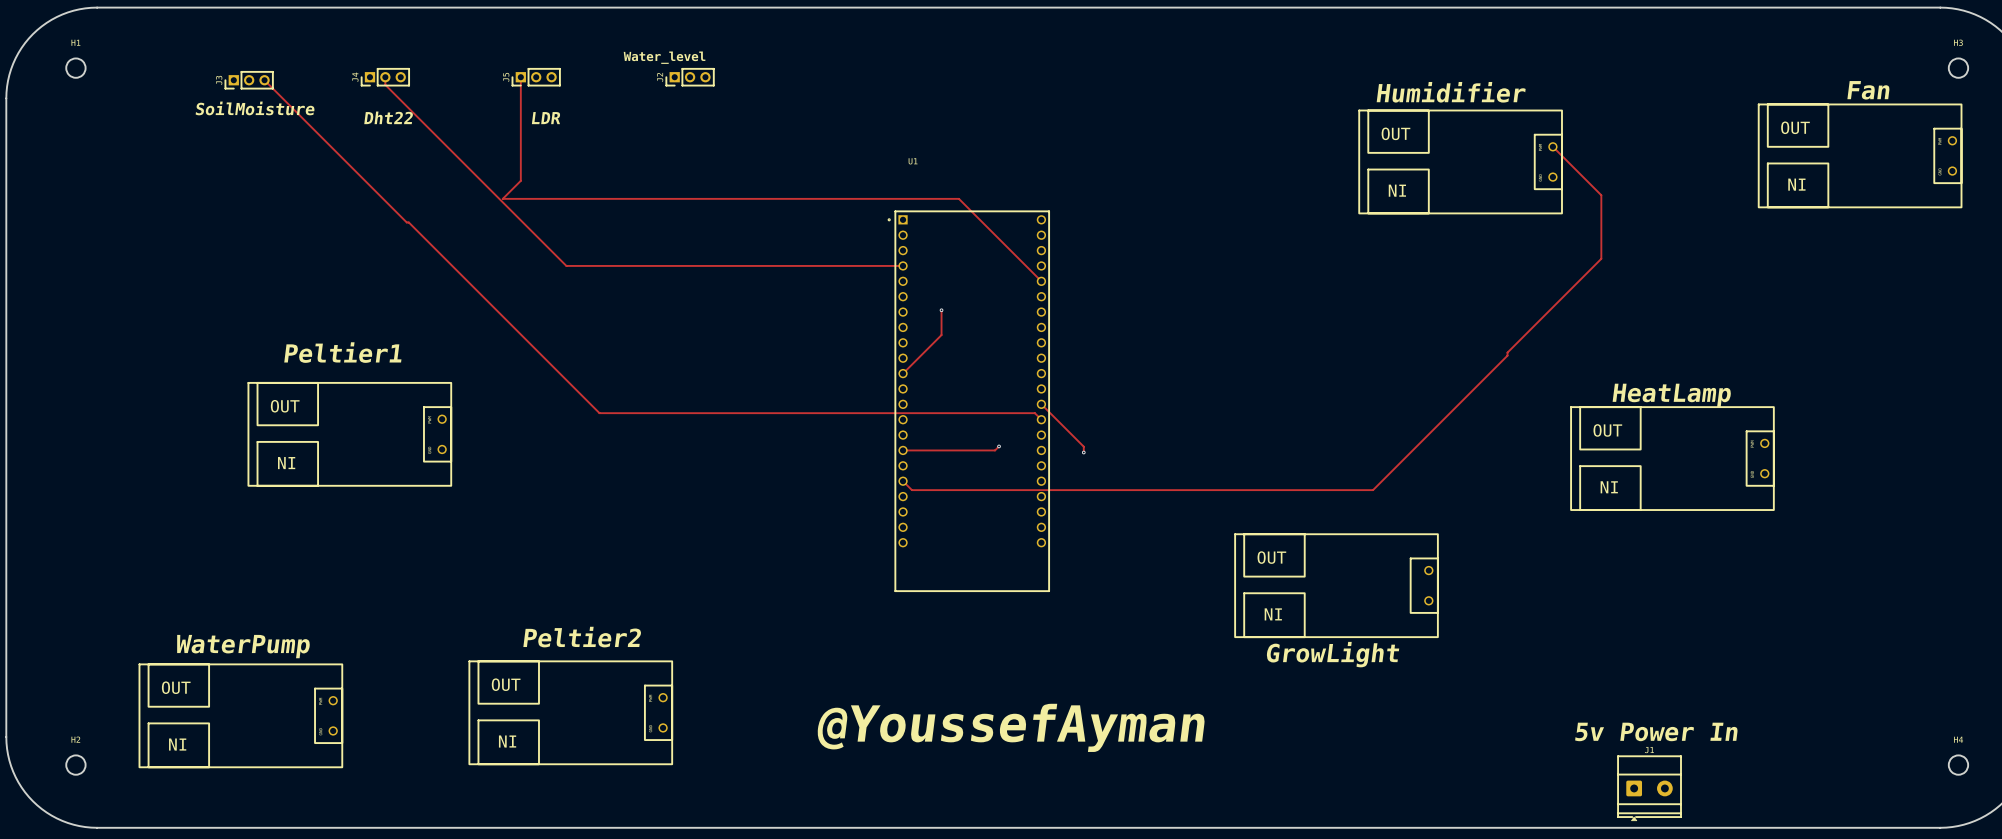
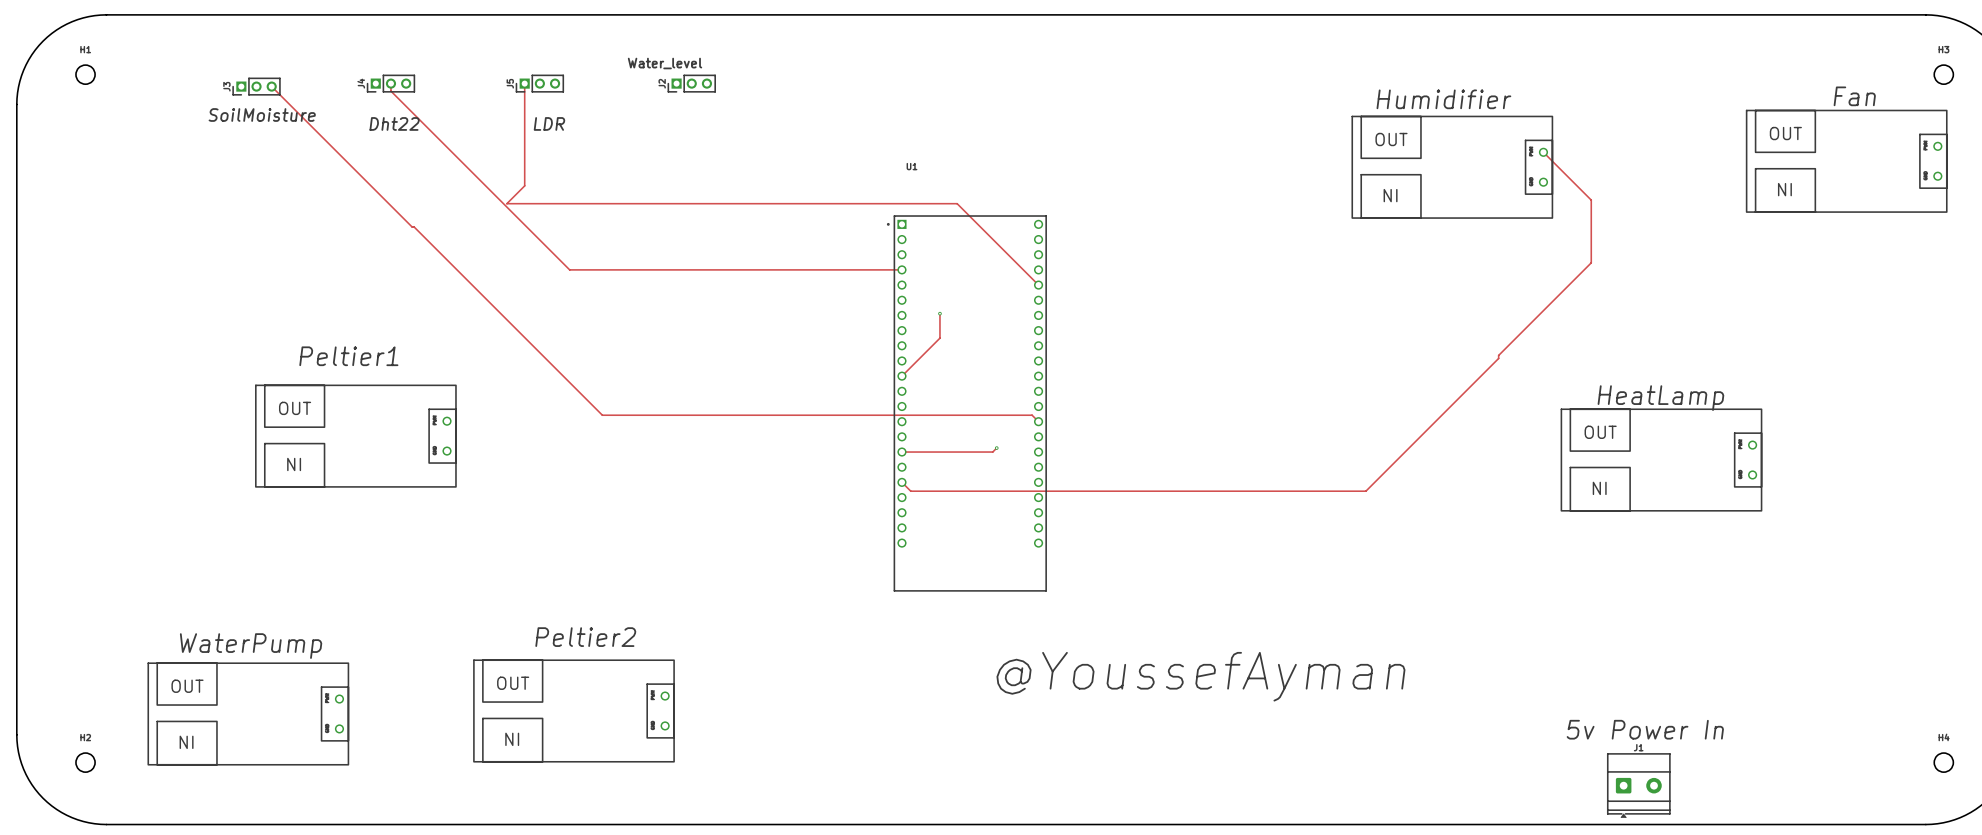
track: (1041, 404) (1083, 446) (1083, 452) -> none
via: (1083, 452) -> none
part: (1336, 585) -> none
text: GrowLight (1332, 654) -> none
text: none -> @YoussefAyman (1200, 676)
text: @YoussefAyman (1010, 727) -> none

